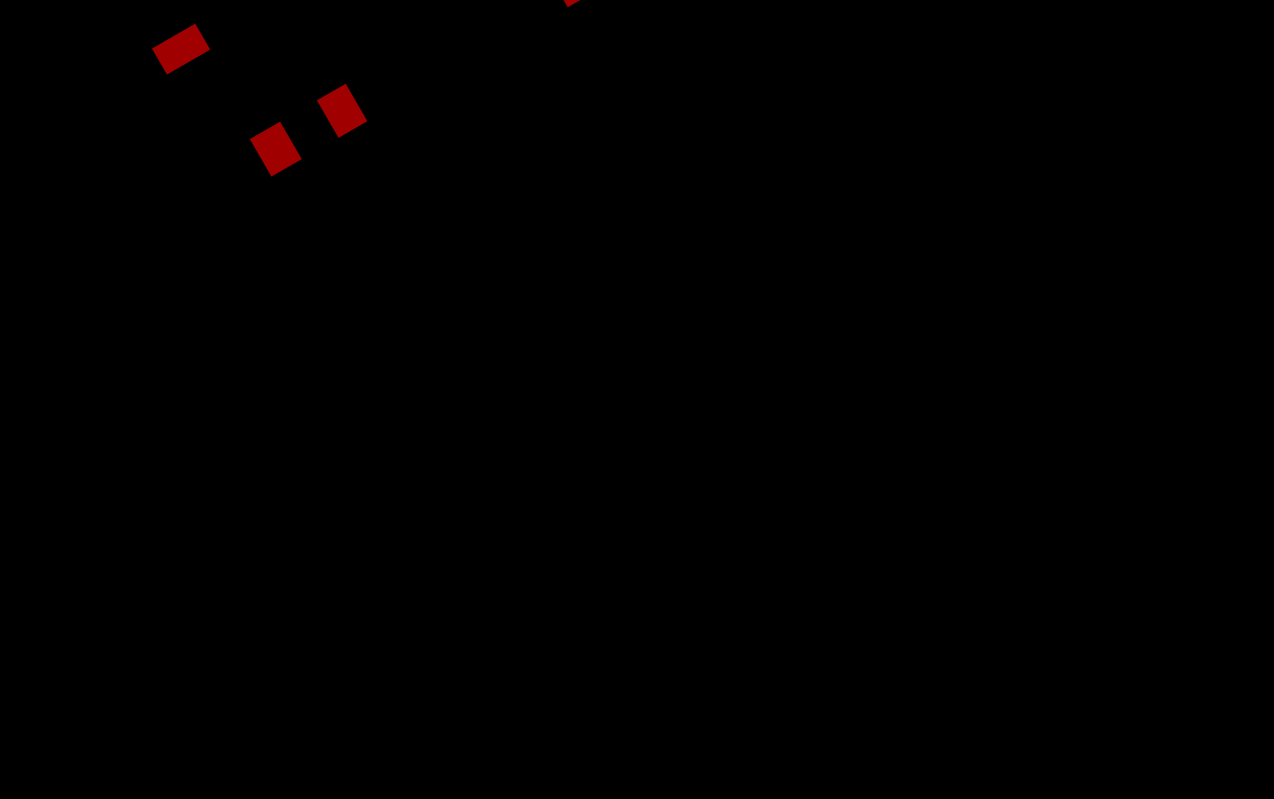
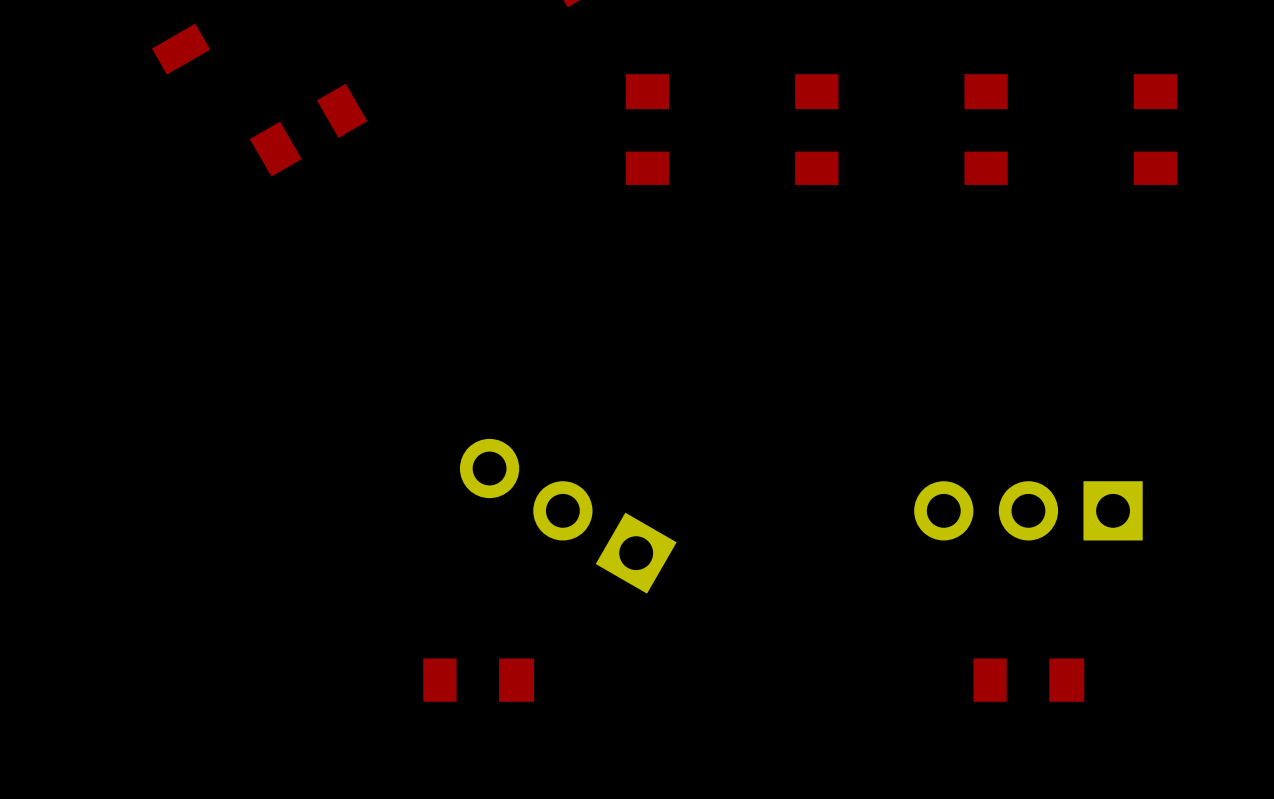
part: none -> (647, 129)
part: none -> (816, 129)
part: none -> (986, 129)
part: none -> (1155, 129)
part: none -> (1028, 510)
part: none -> (568, 516)
part: none -> (478, 680)
part: none -> (1028, 680)

